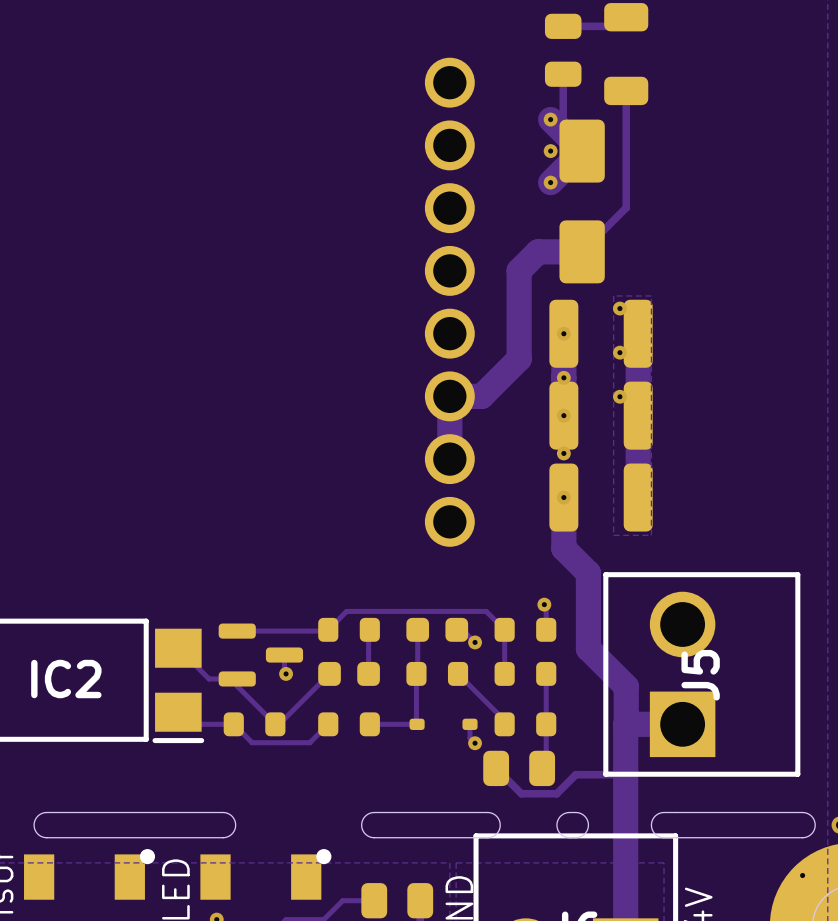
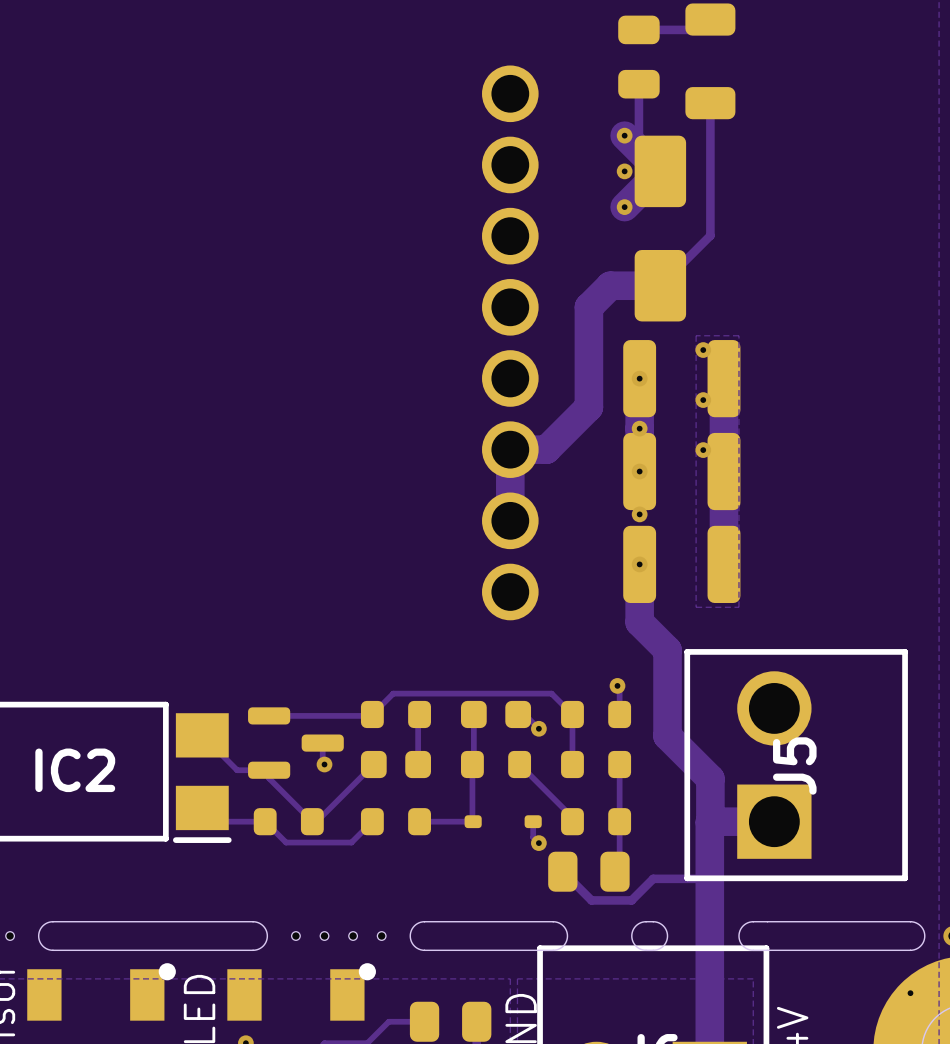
part: none -> (10, 936)
part: none -> (295, 936)
part: none -> (324, 936)
part: none -> (353, 936)
part: none -> (381, 936)

